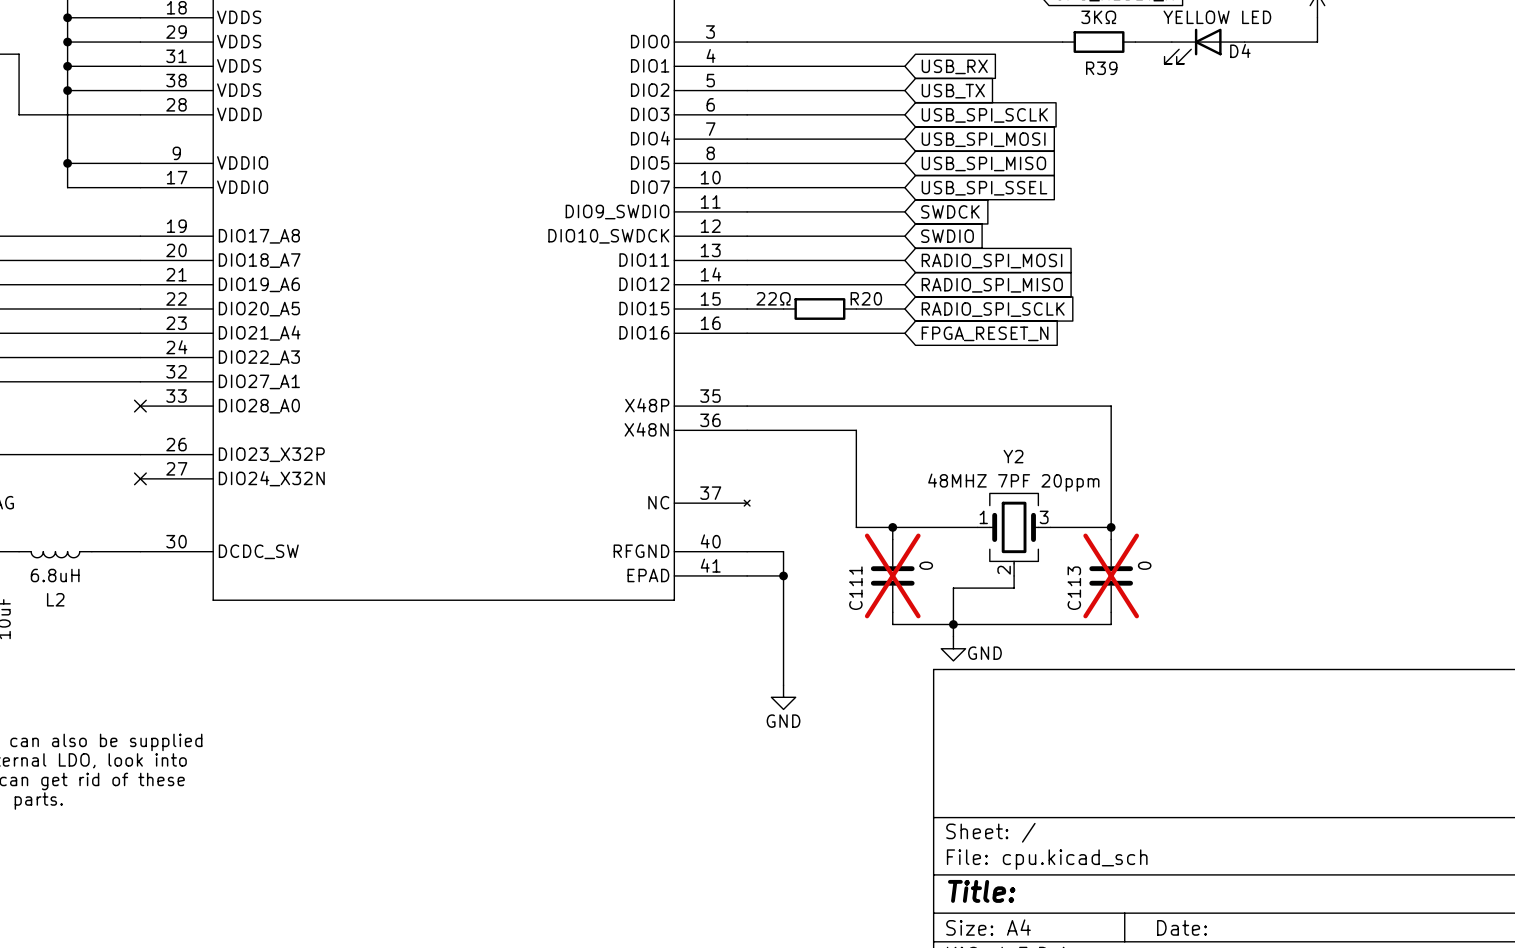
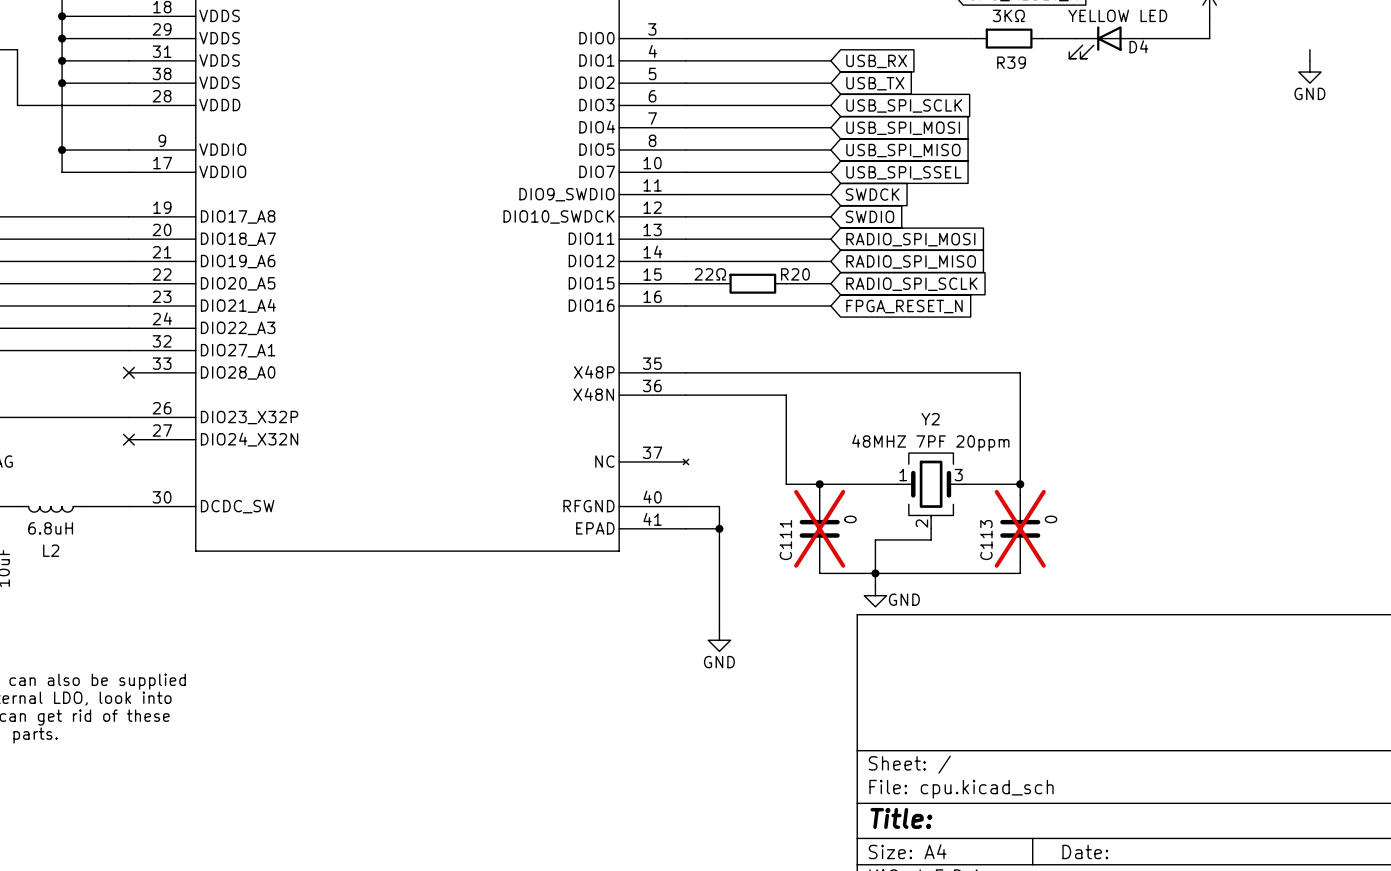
wire: none -> (1309, 49) (1309, 60)
power symbol: none -> GND (1309, 72)

